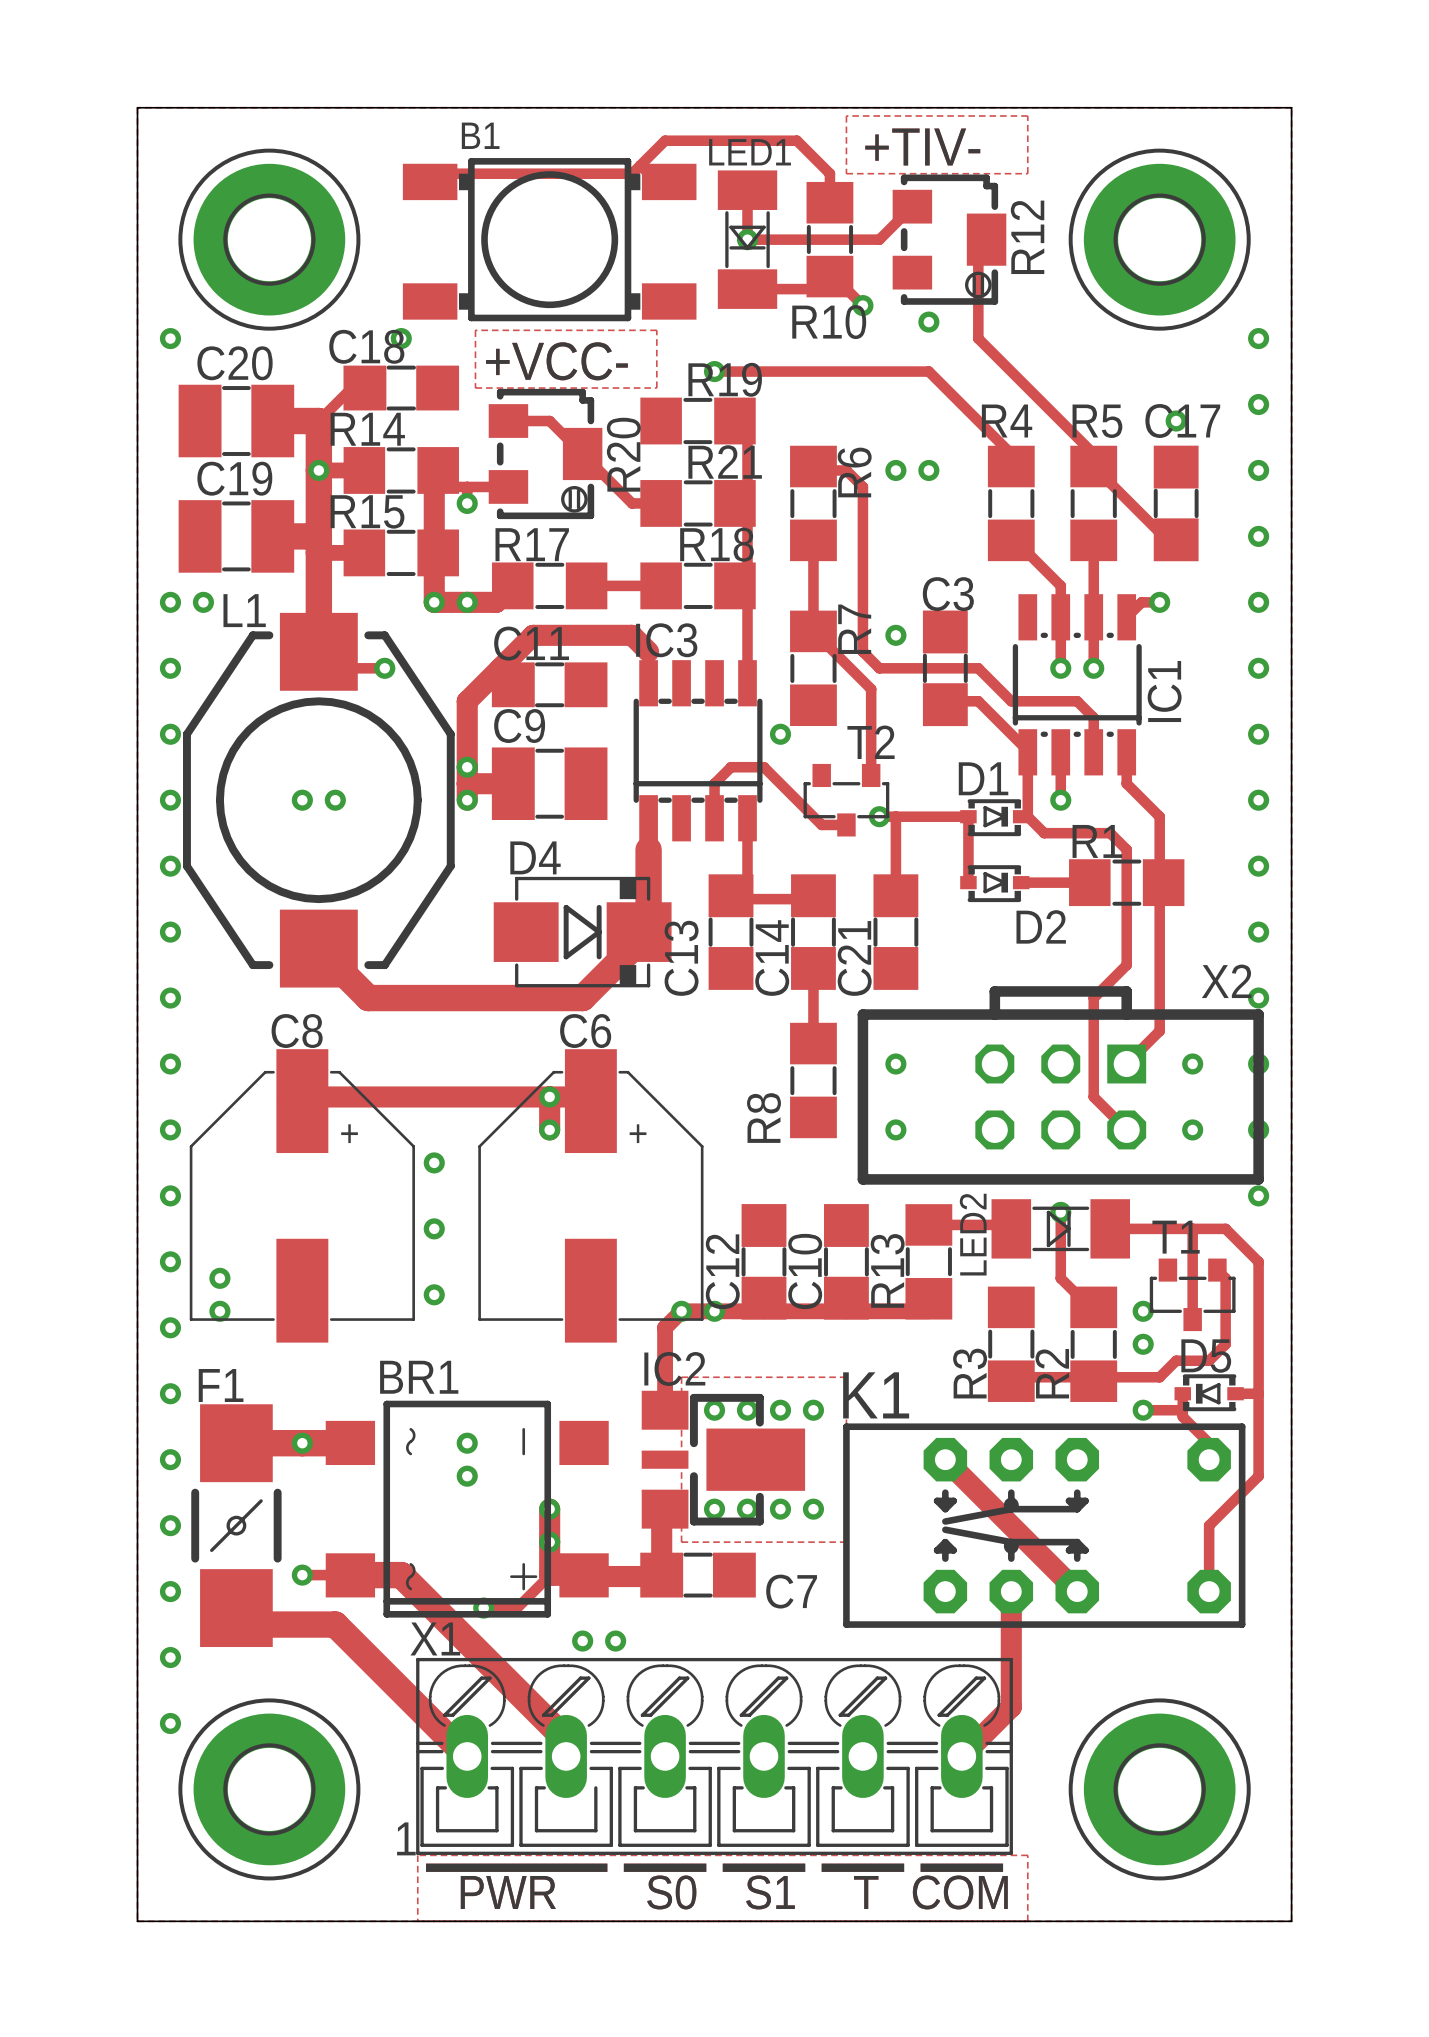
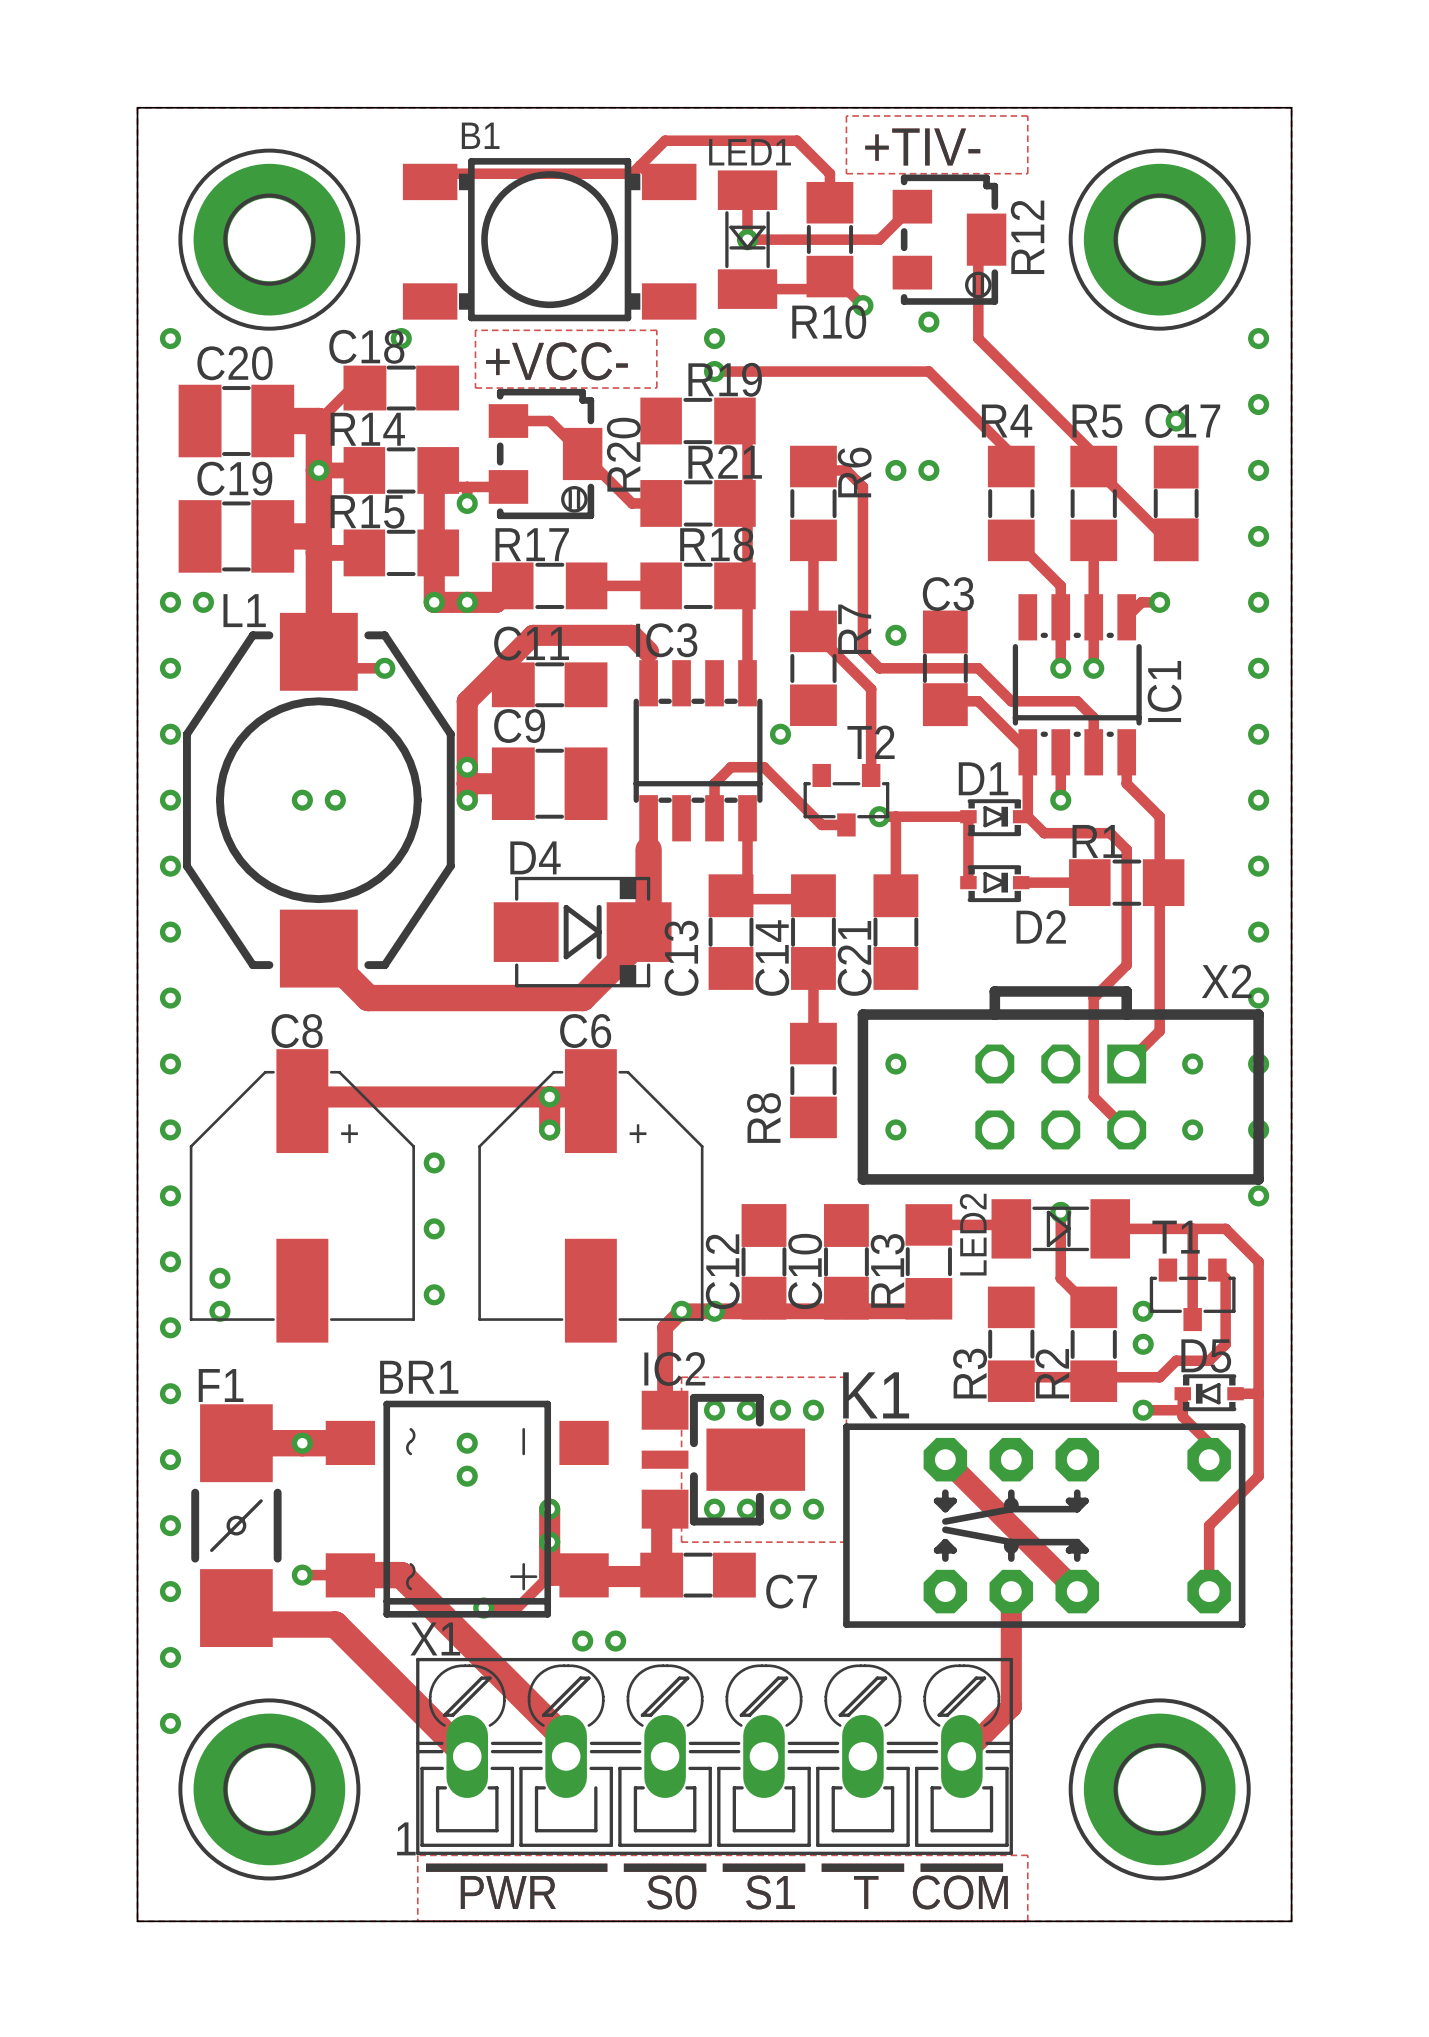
via: none -> (714, 338)

